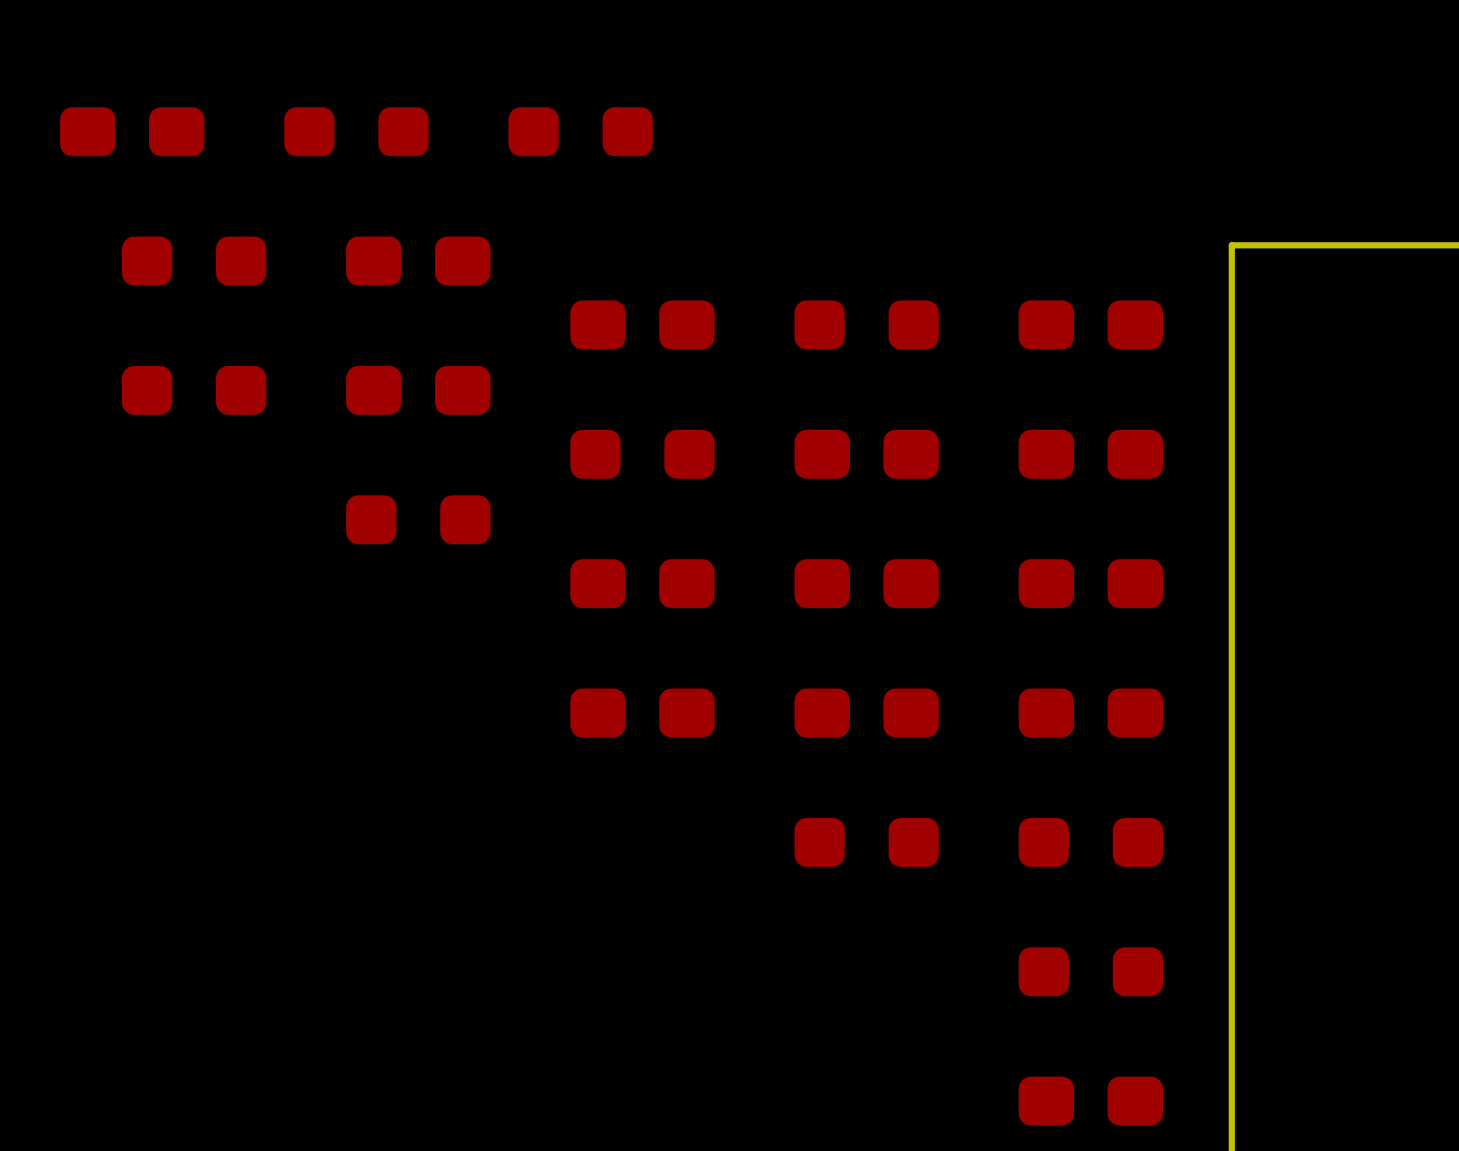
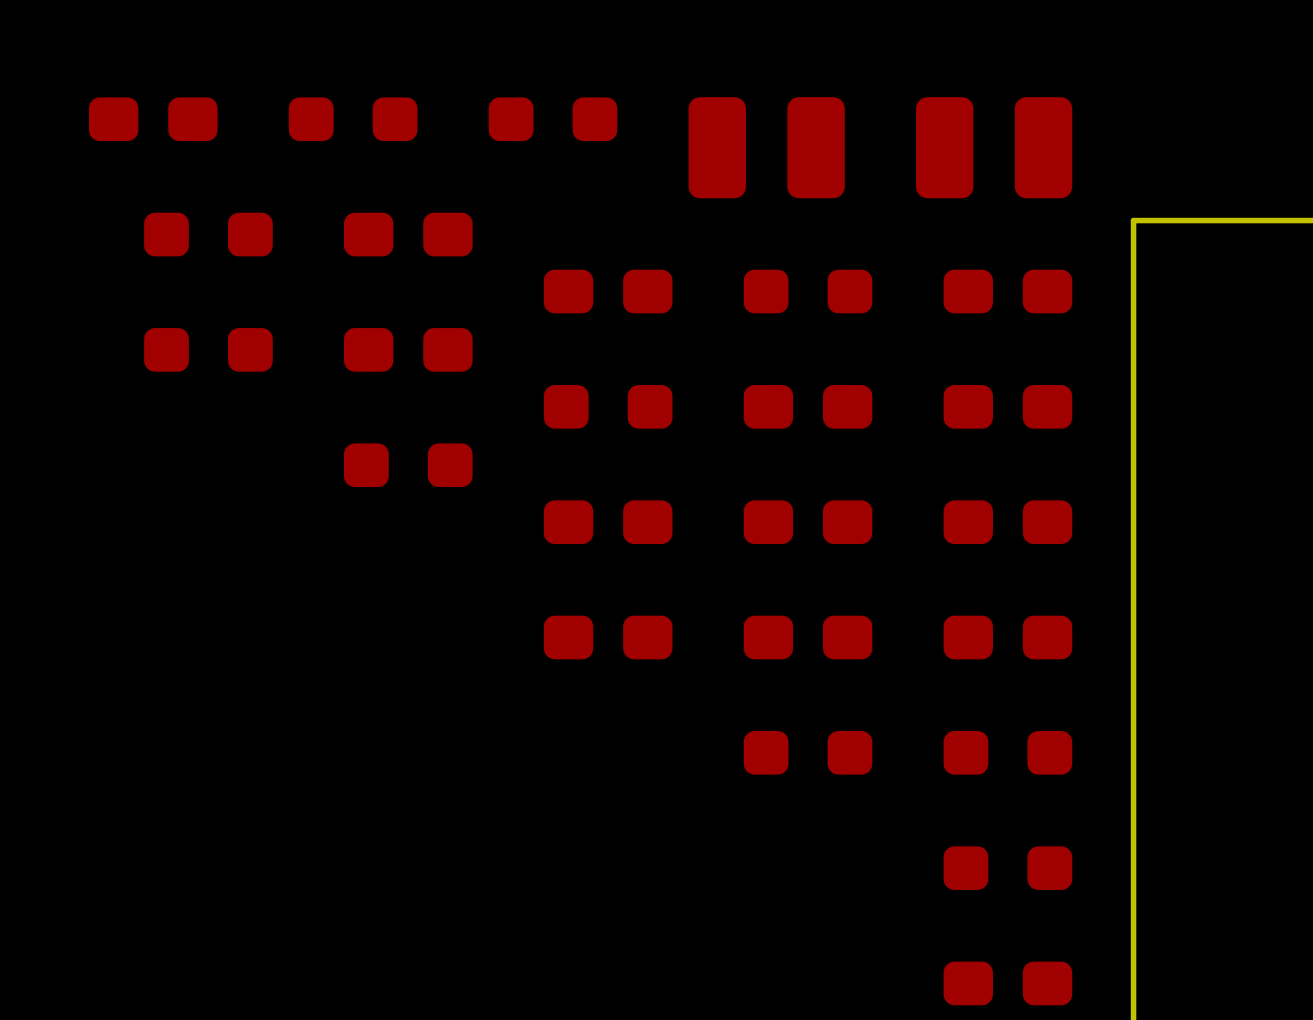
part: none -> (766, 147)
part: none -> (994, 147)

